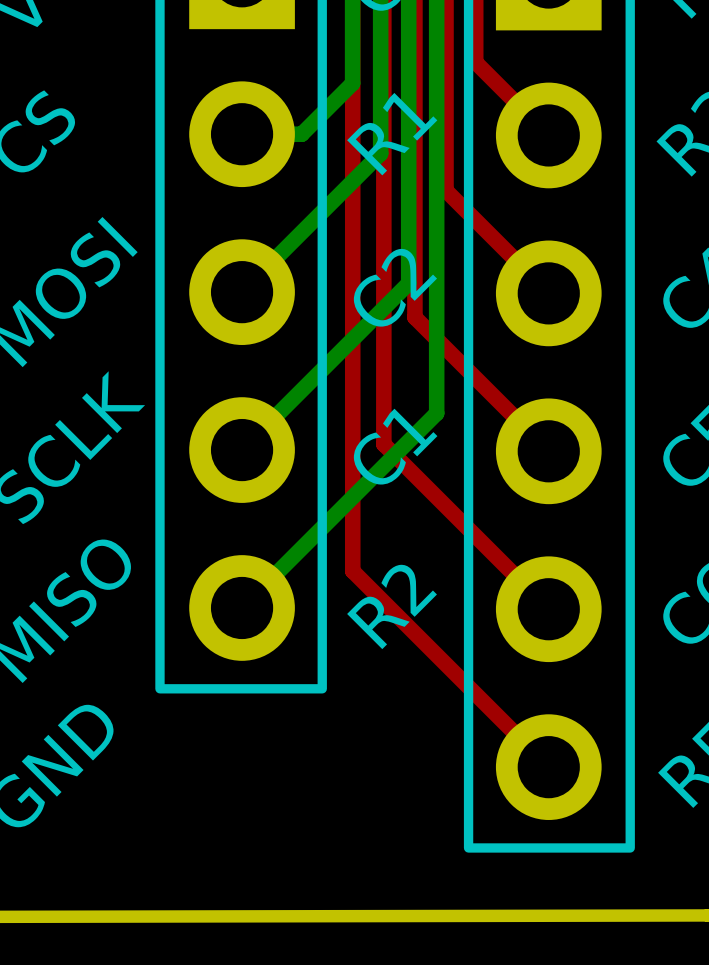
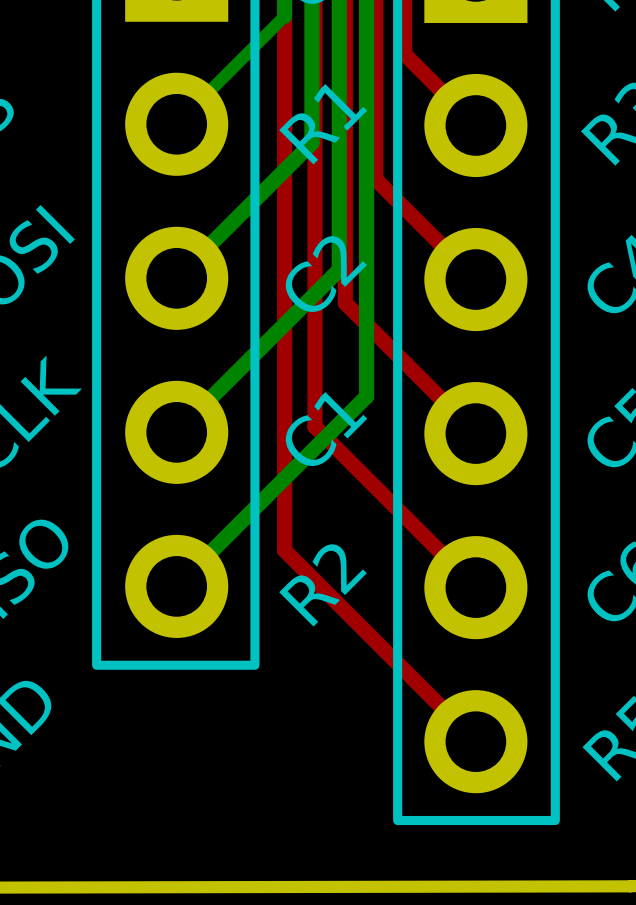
bottom track: (352, 23) (352, 83) (301, 134) (242, 134) -> (284, 16) (176, 124)

